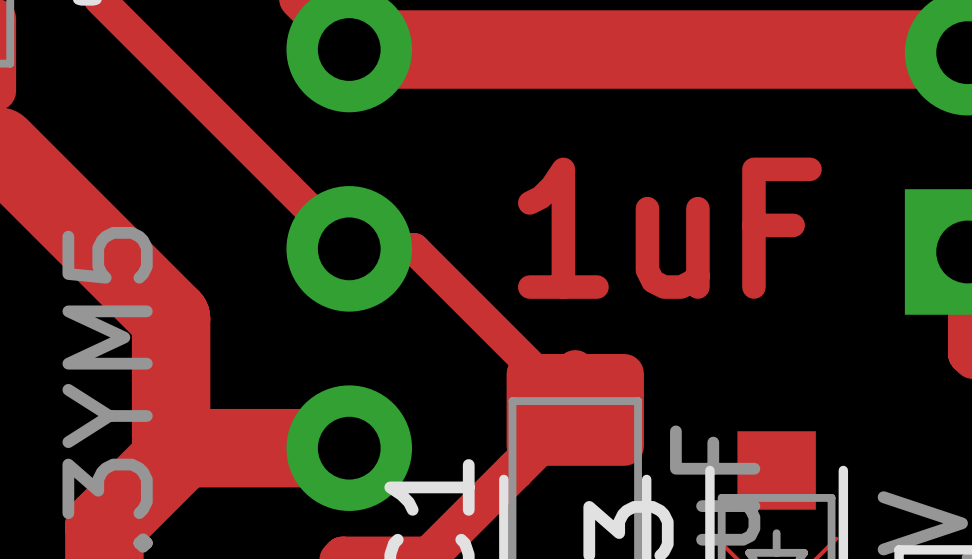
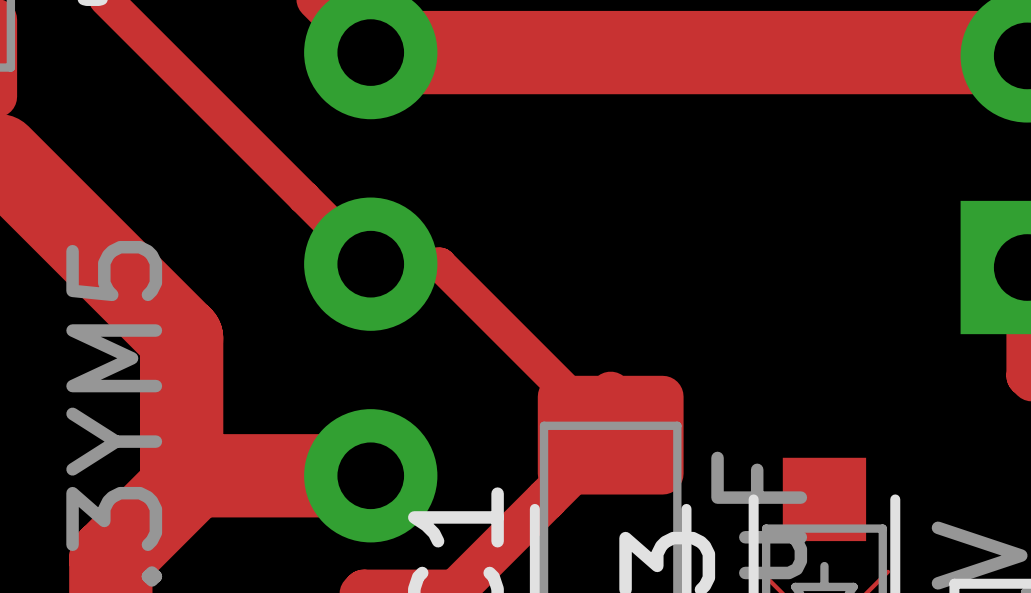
text: 1uF (669, 228) -> none

